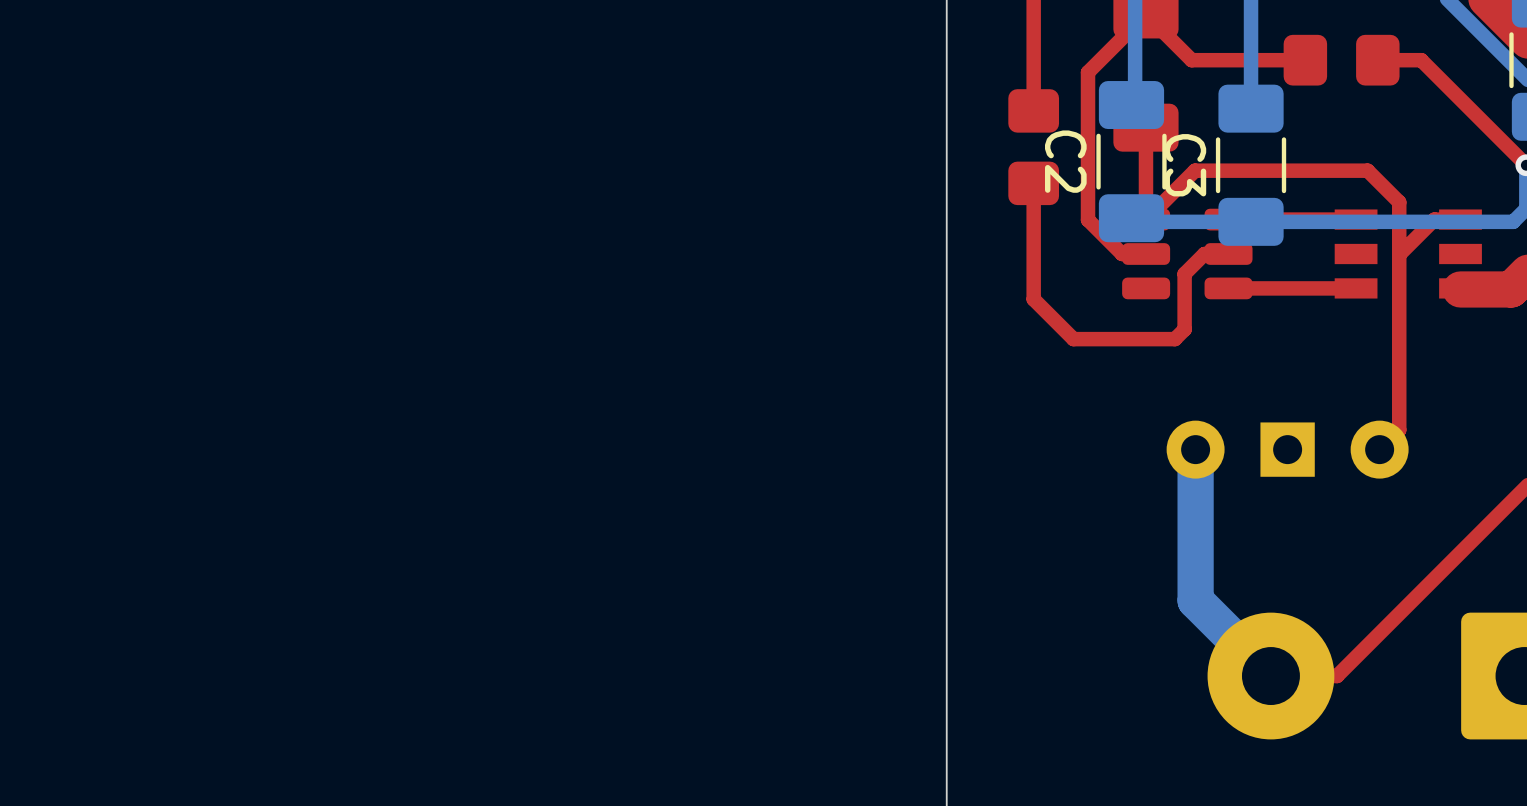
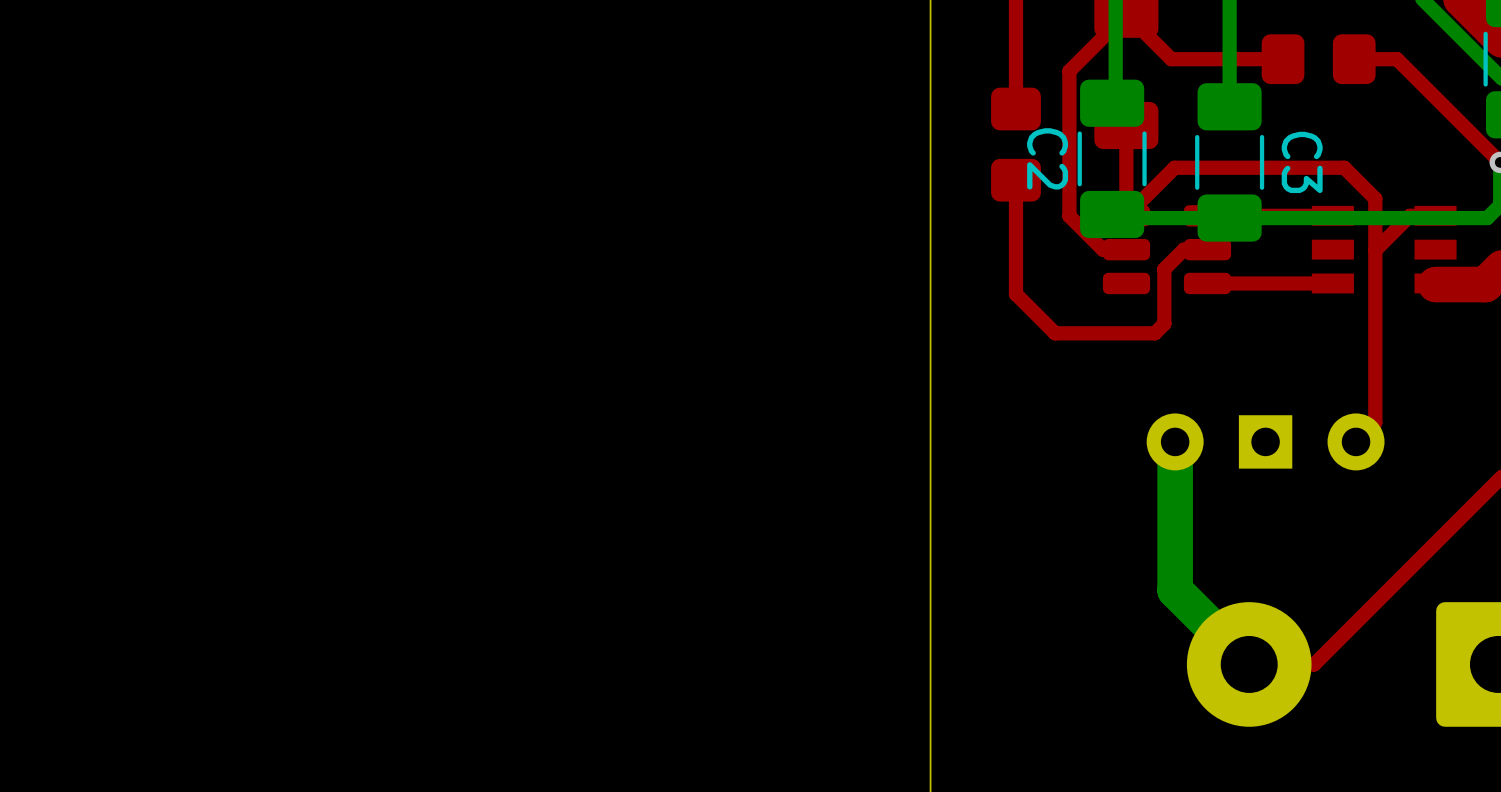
C3 name position: C3 (1185, 165) -> C3 (1302, 162)

